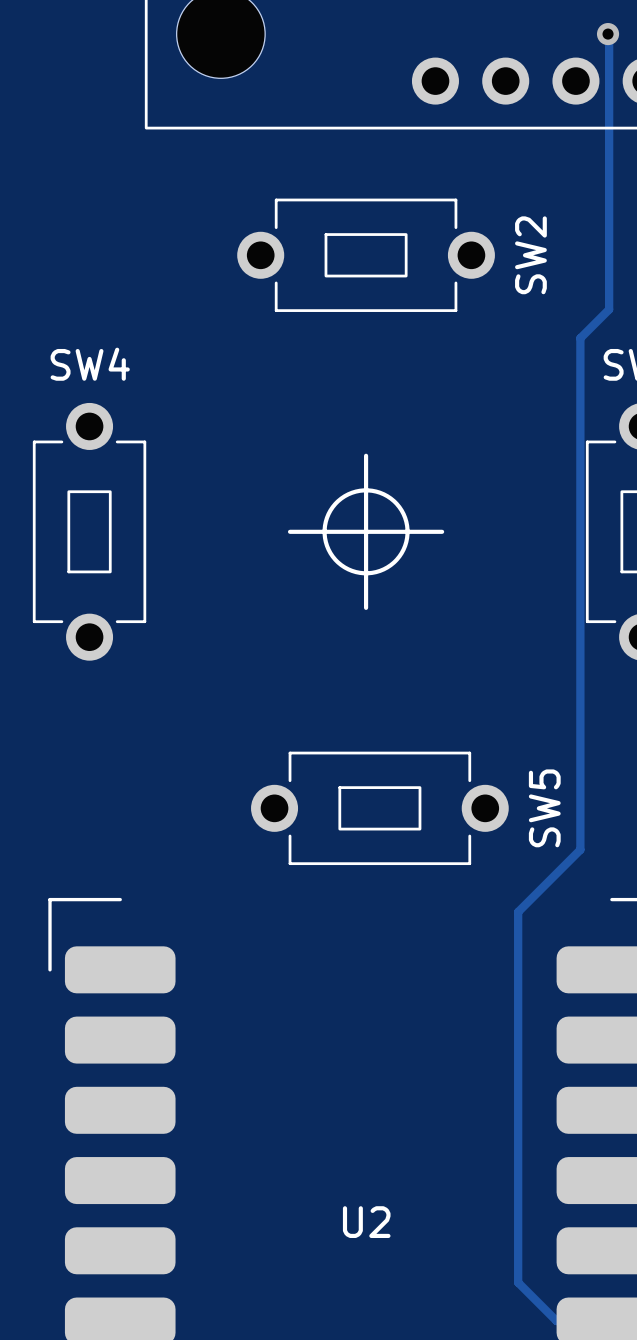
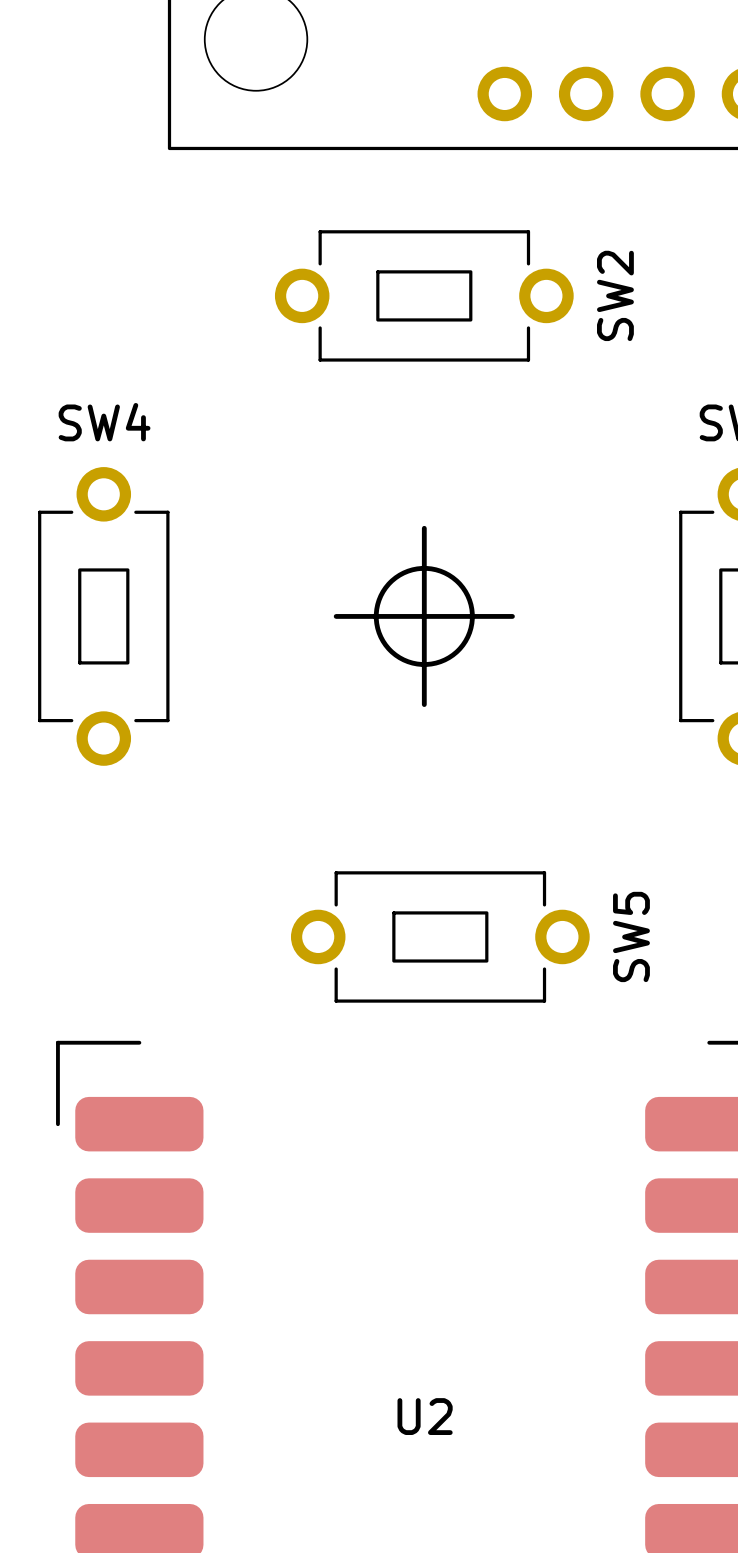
track: (608, 34) (609, 309) (580, 338) (580, 849) (518, 912) (518, 1282) (556, 1321) (611, 1321) -> none
via: (608, 34) -> none

